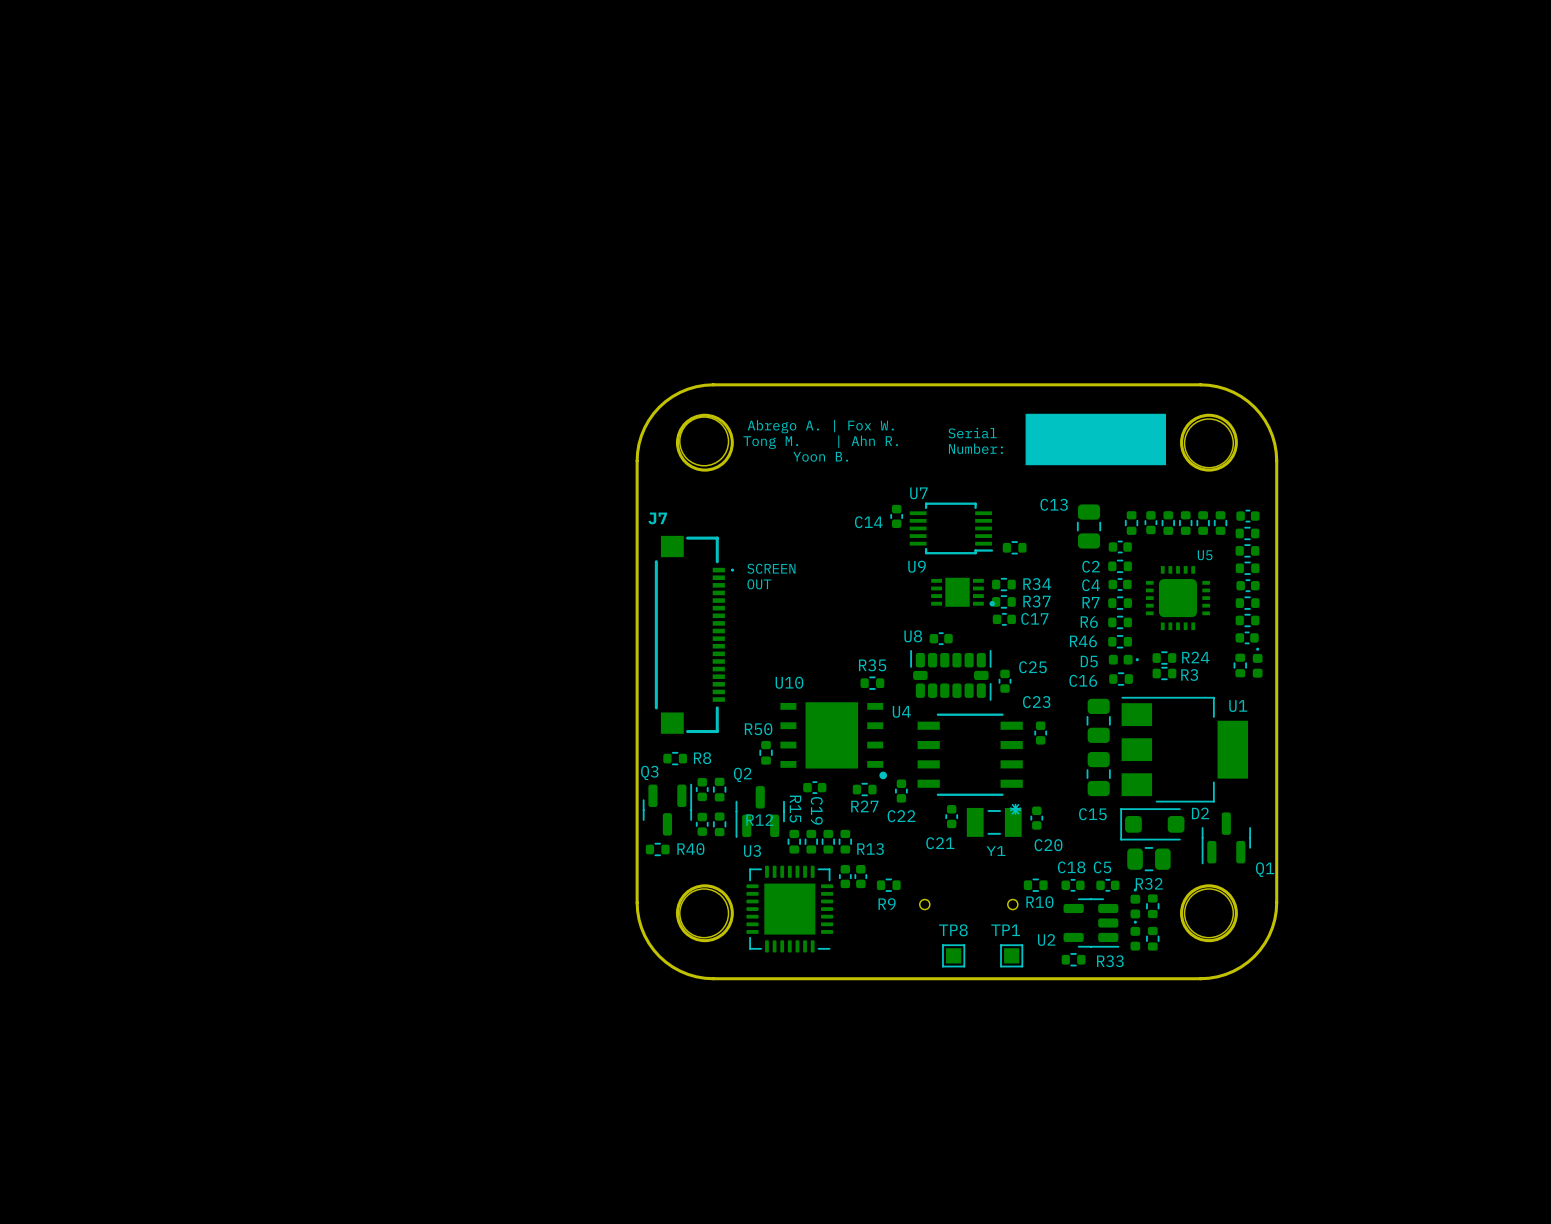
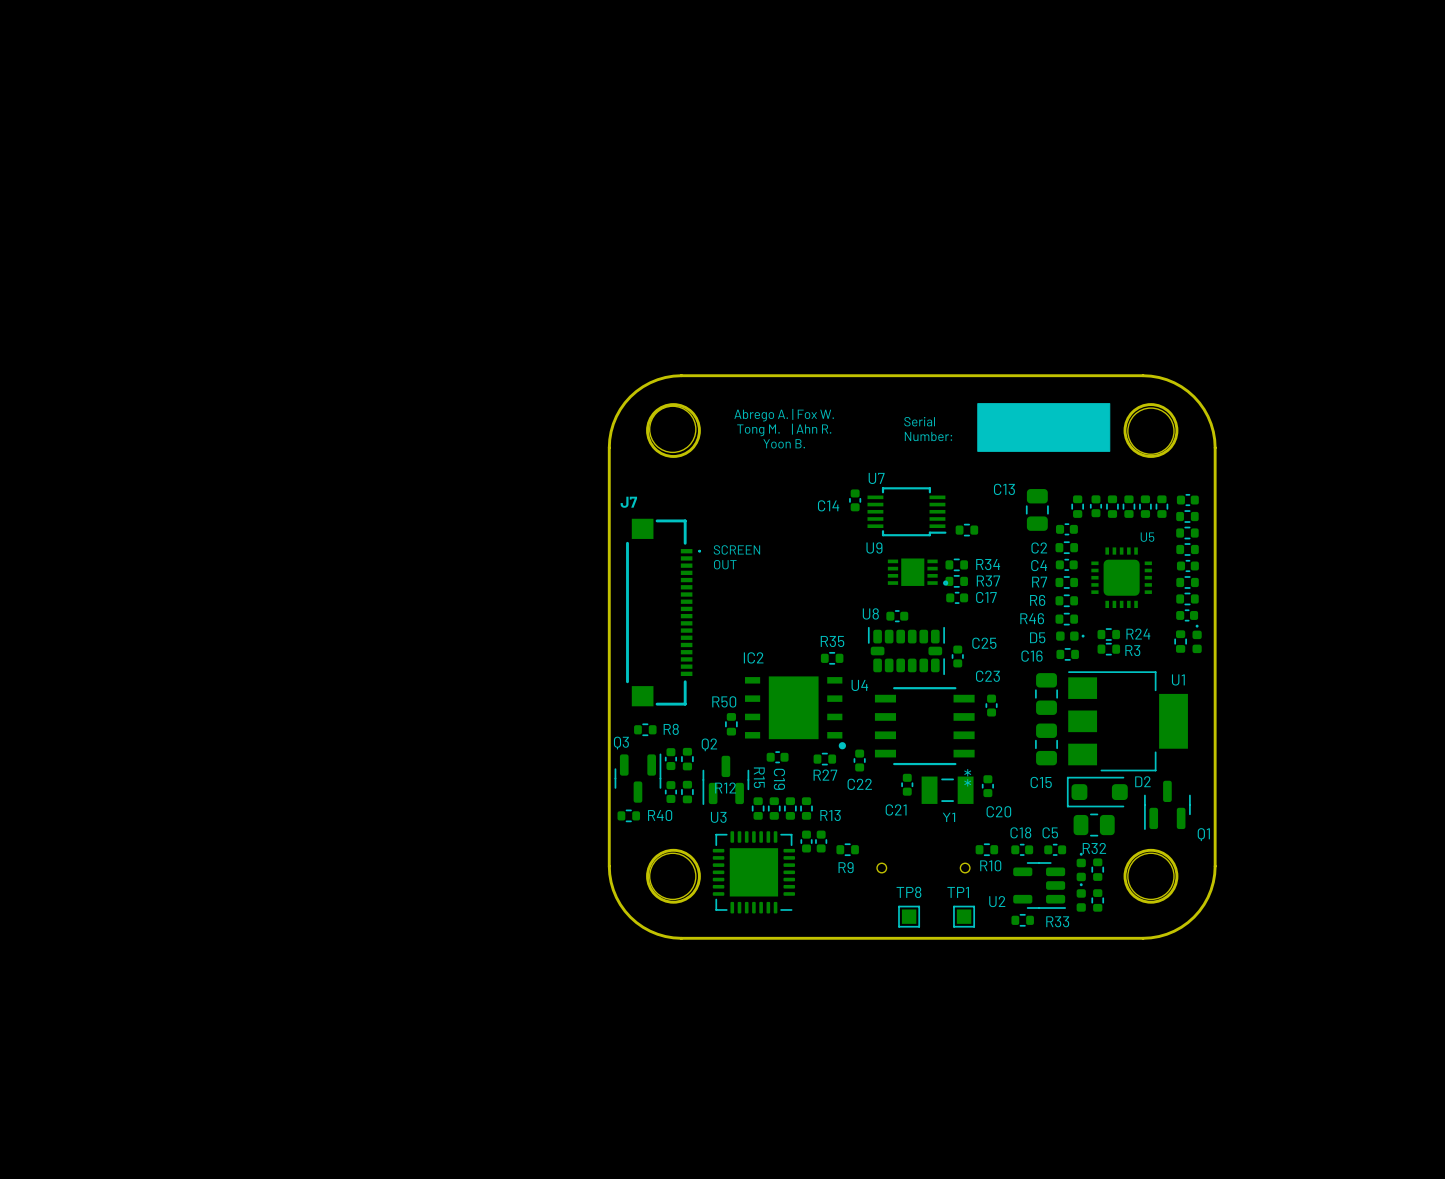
U10 name: U10 (789, 682) -> IC2 (753, 657)

